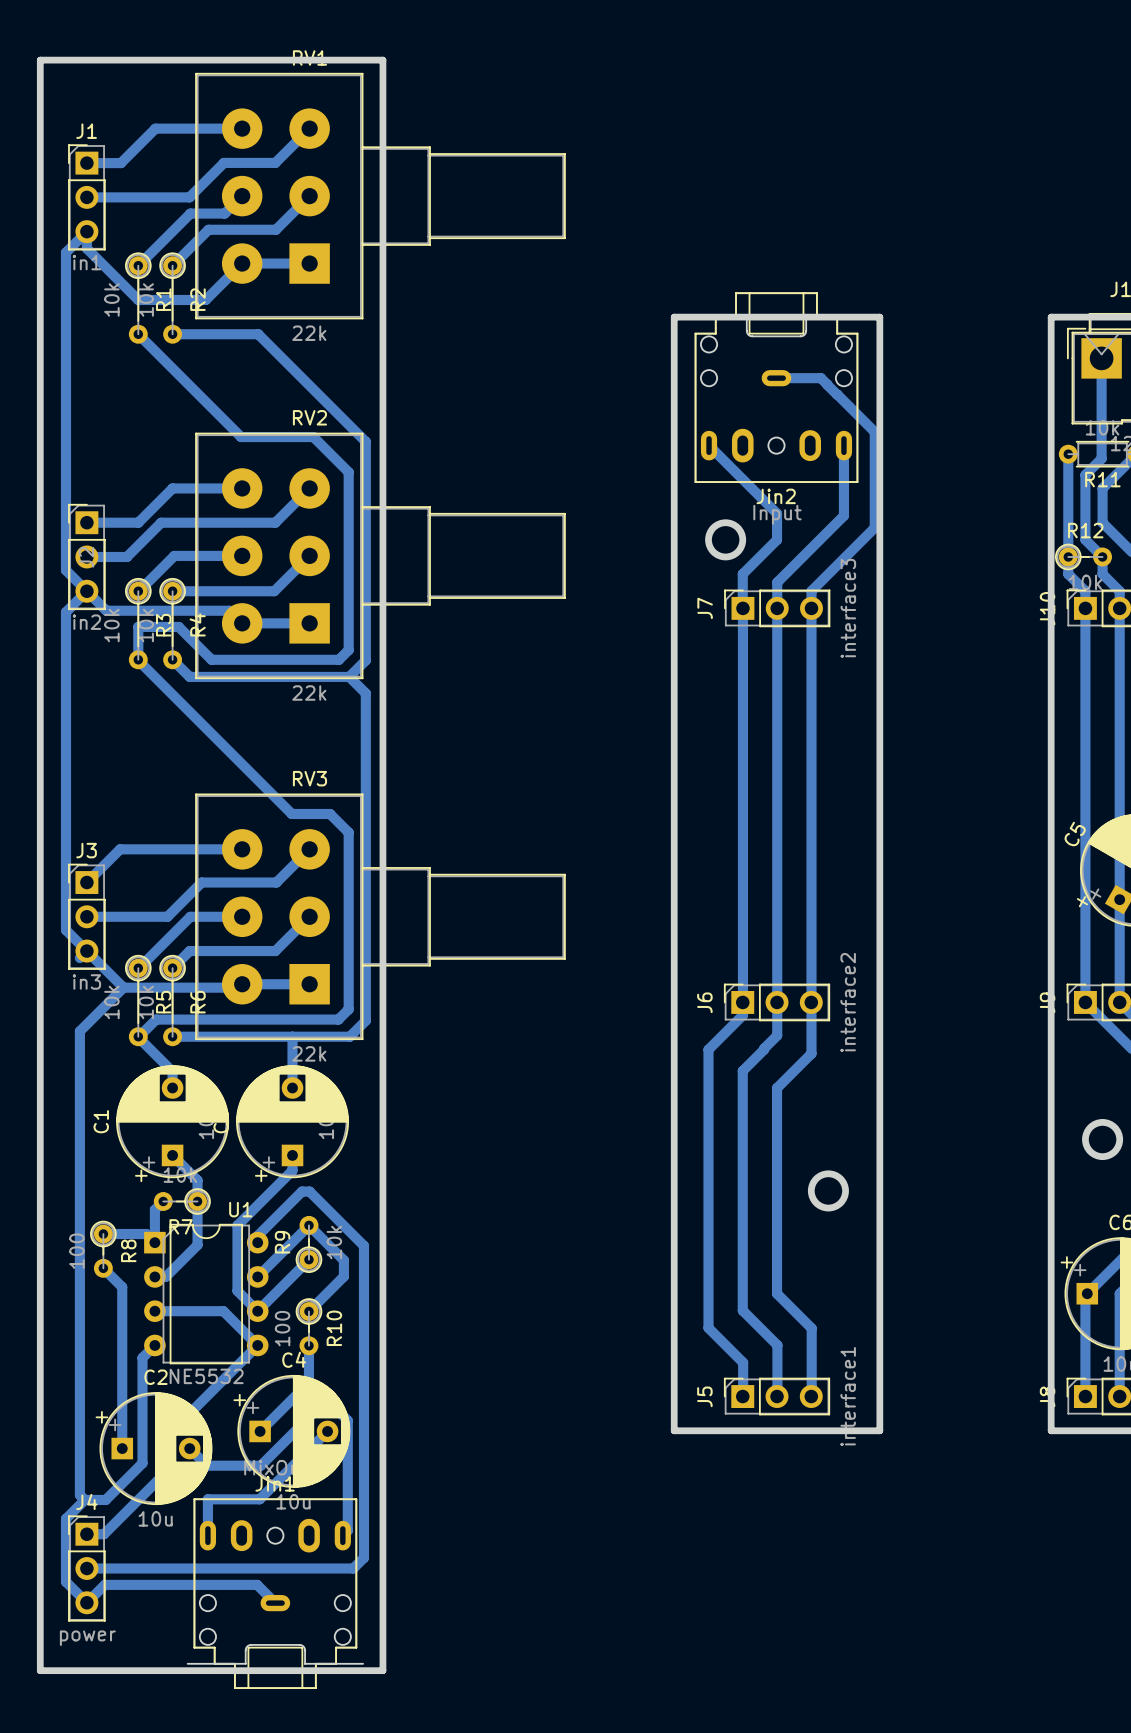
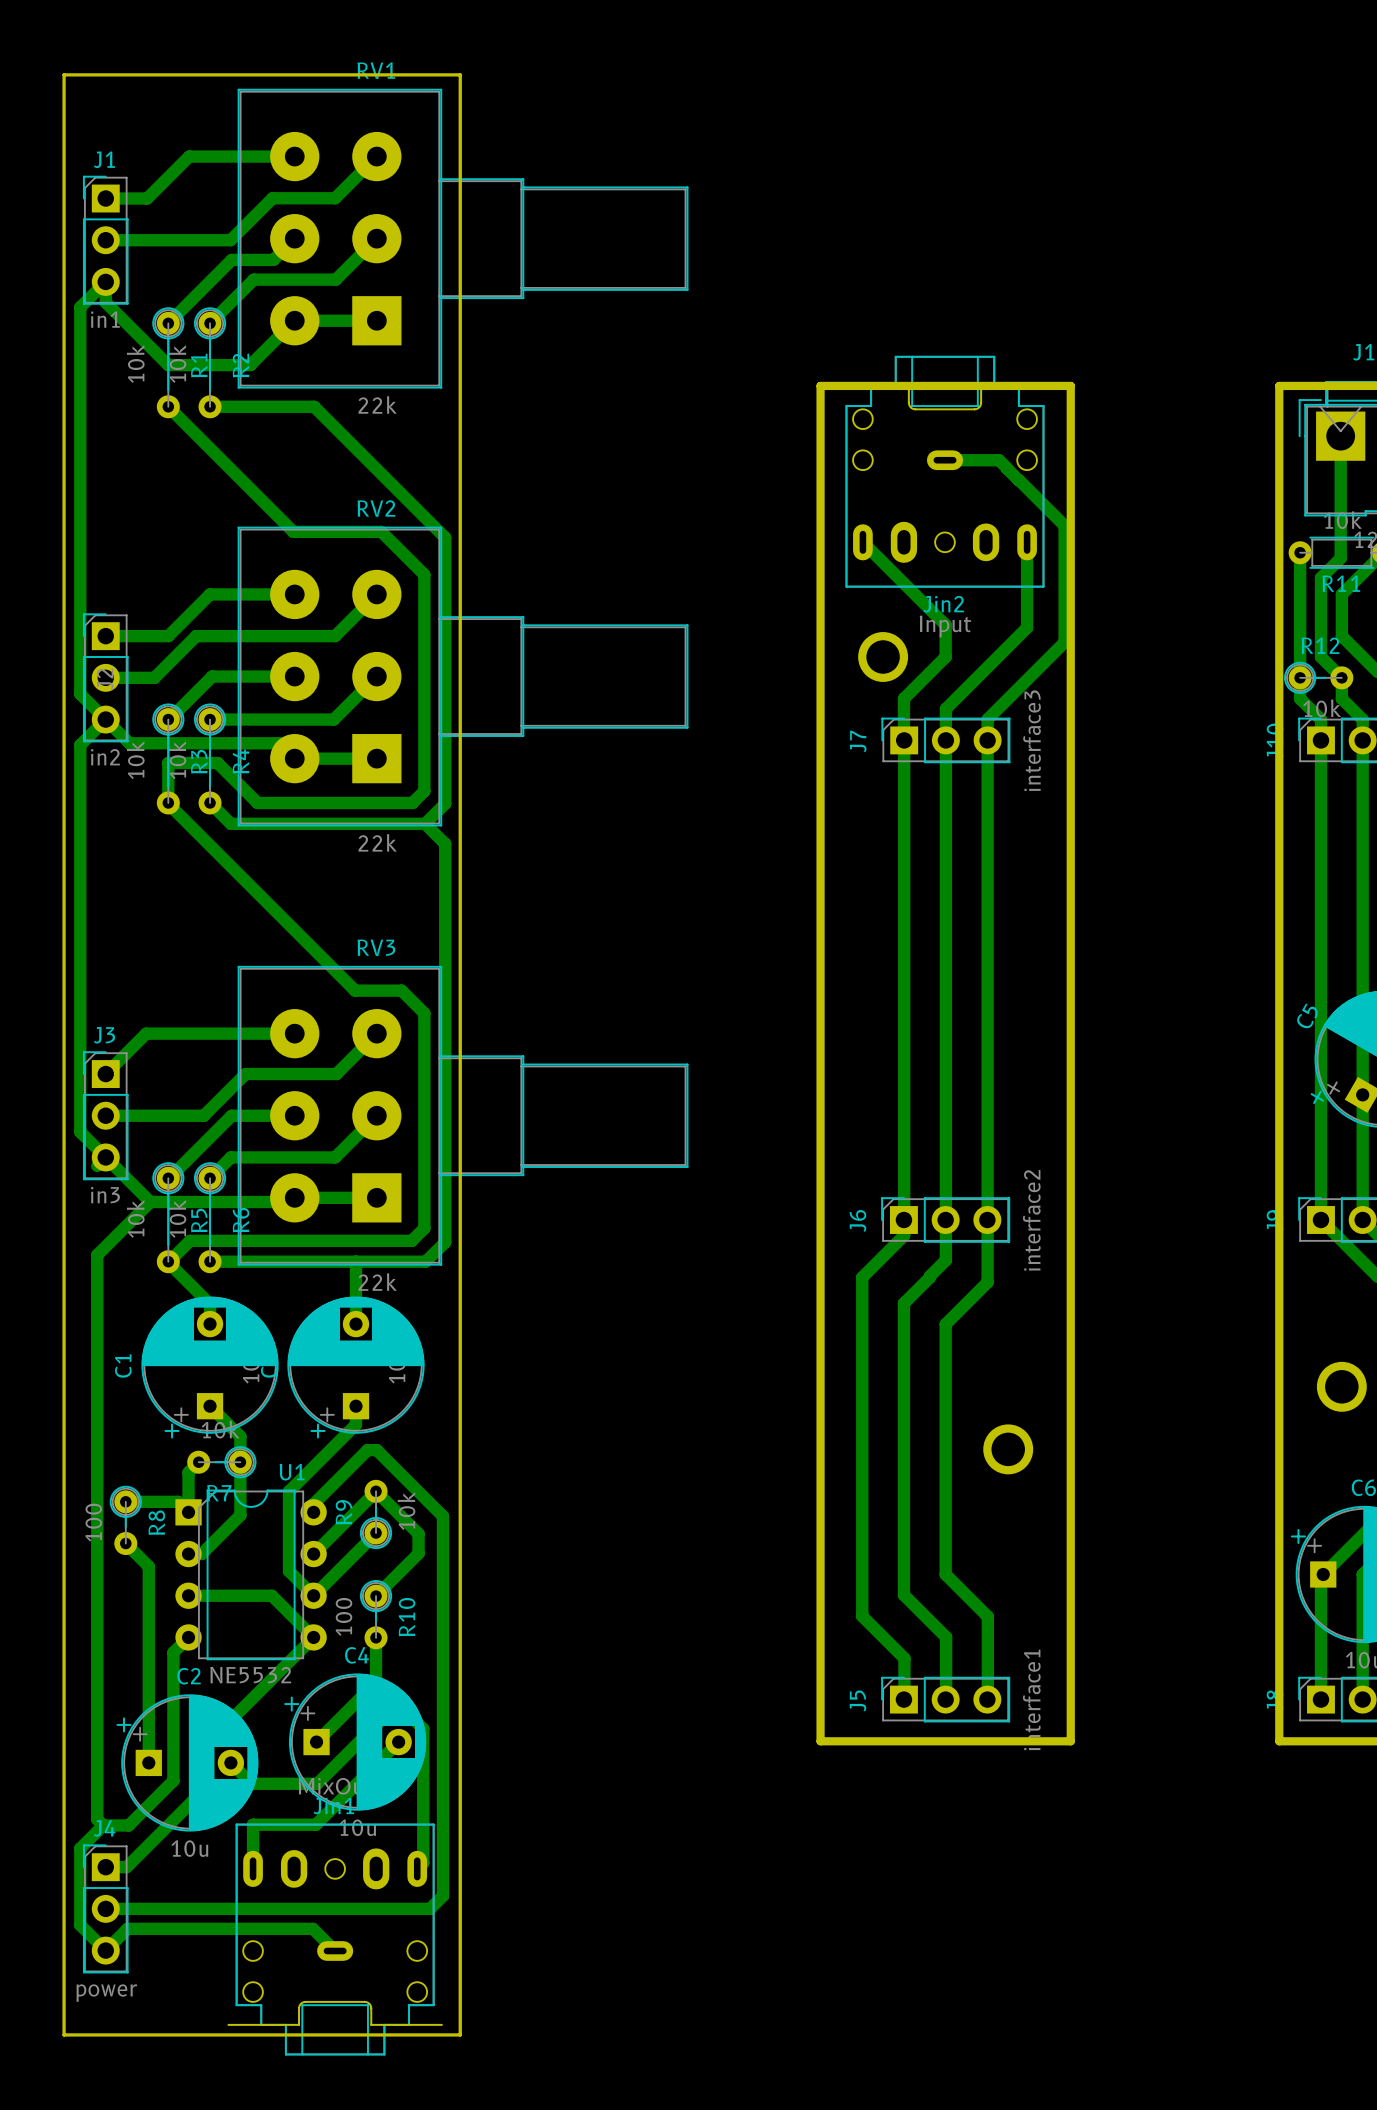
board edge: (40, 60) (382, 60) (382, 1670) (40, 1670) (40, 60) -> (64, 74) (64, 2034) (460, 2034) (460, 74) (64, 74)

